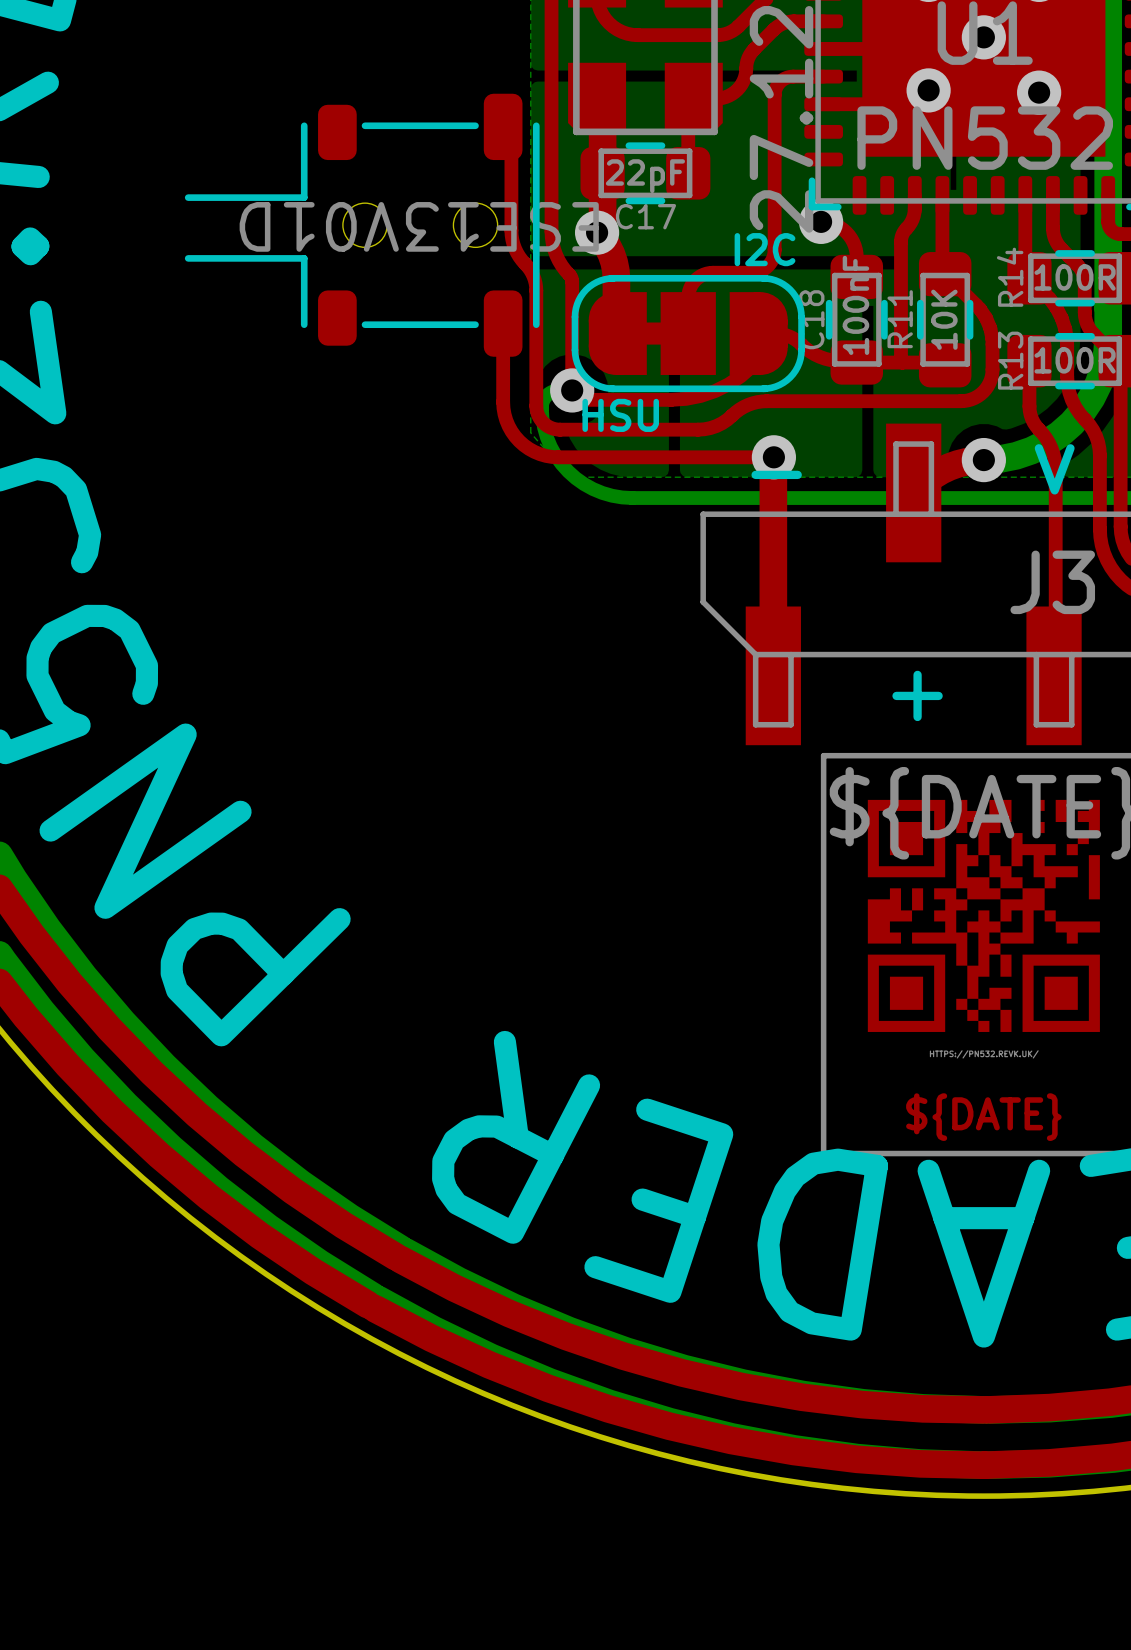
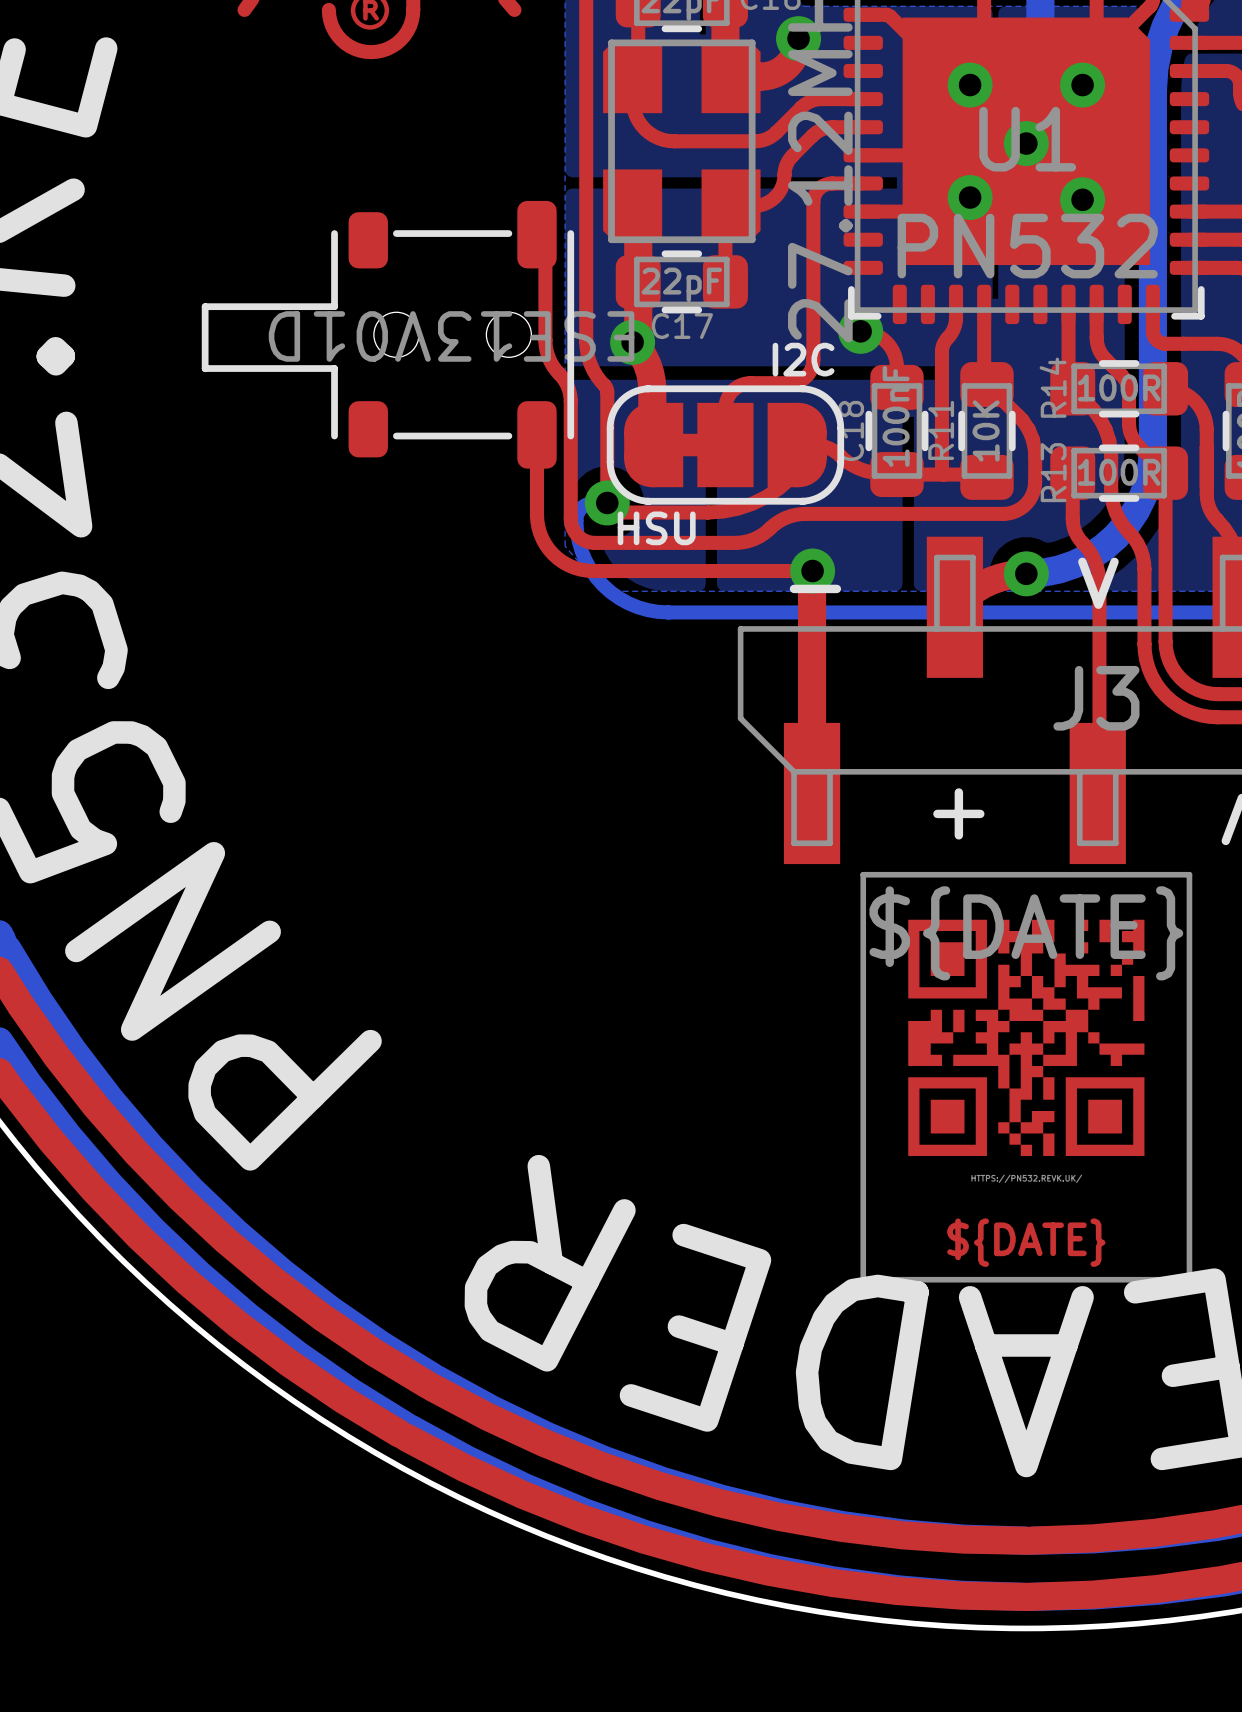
part footprint: [184, 93, 540, 357] -> [201, 200, 575, 469]

